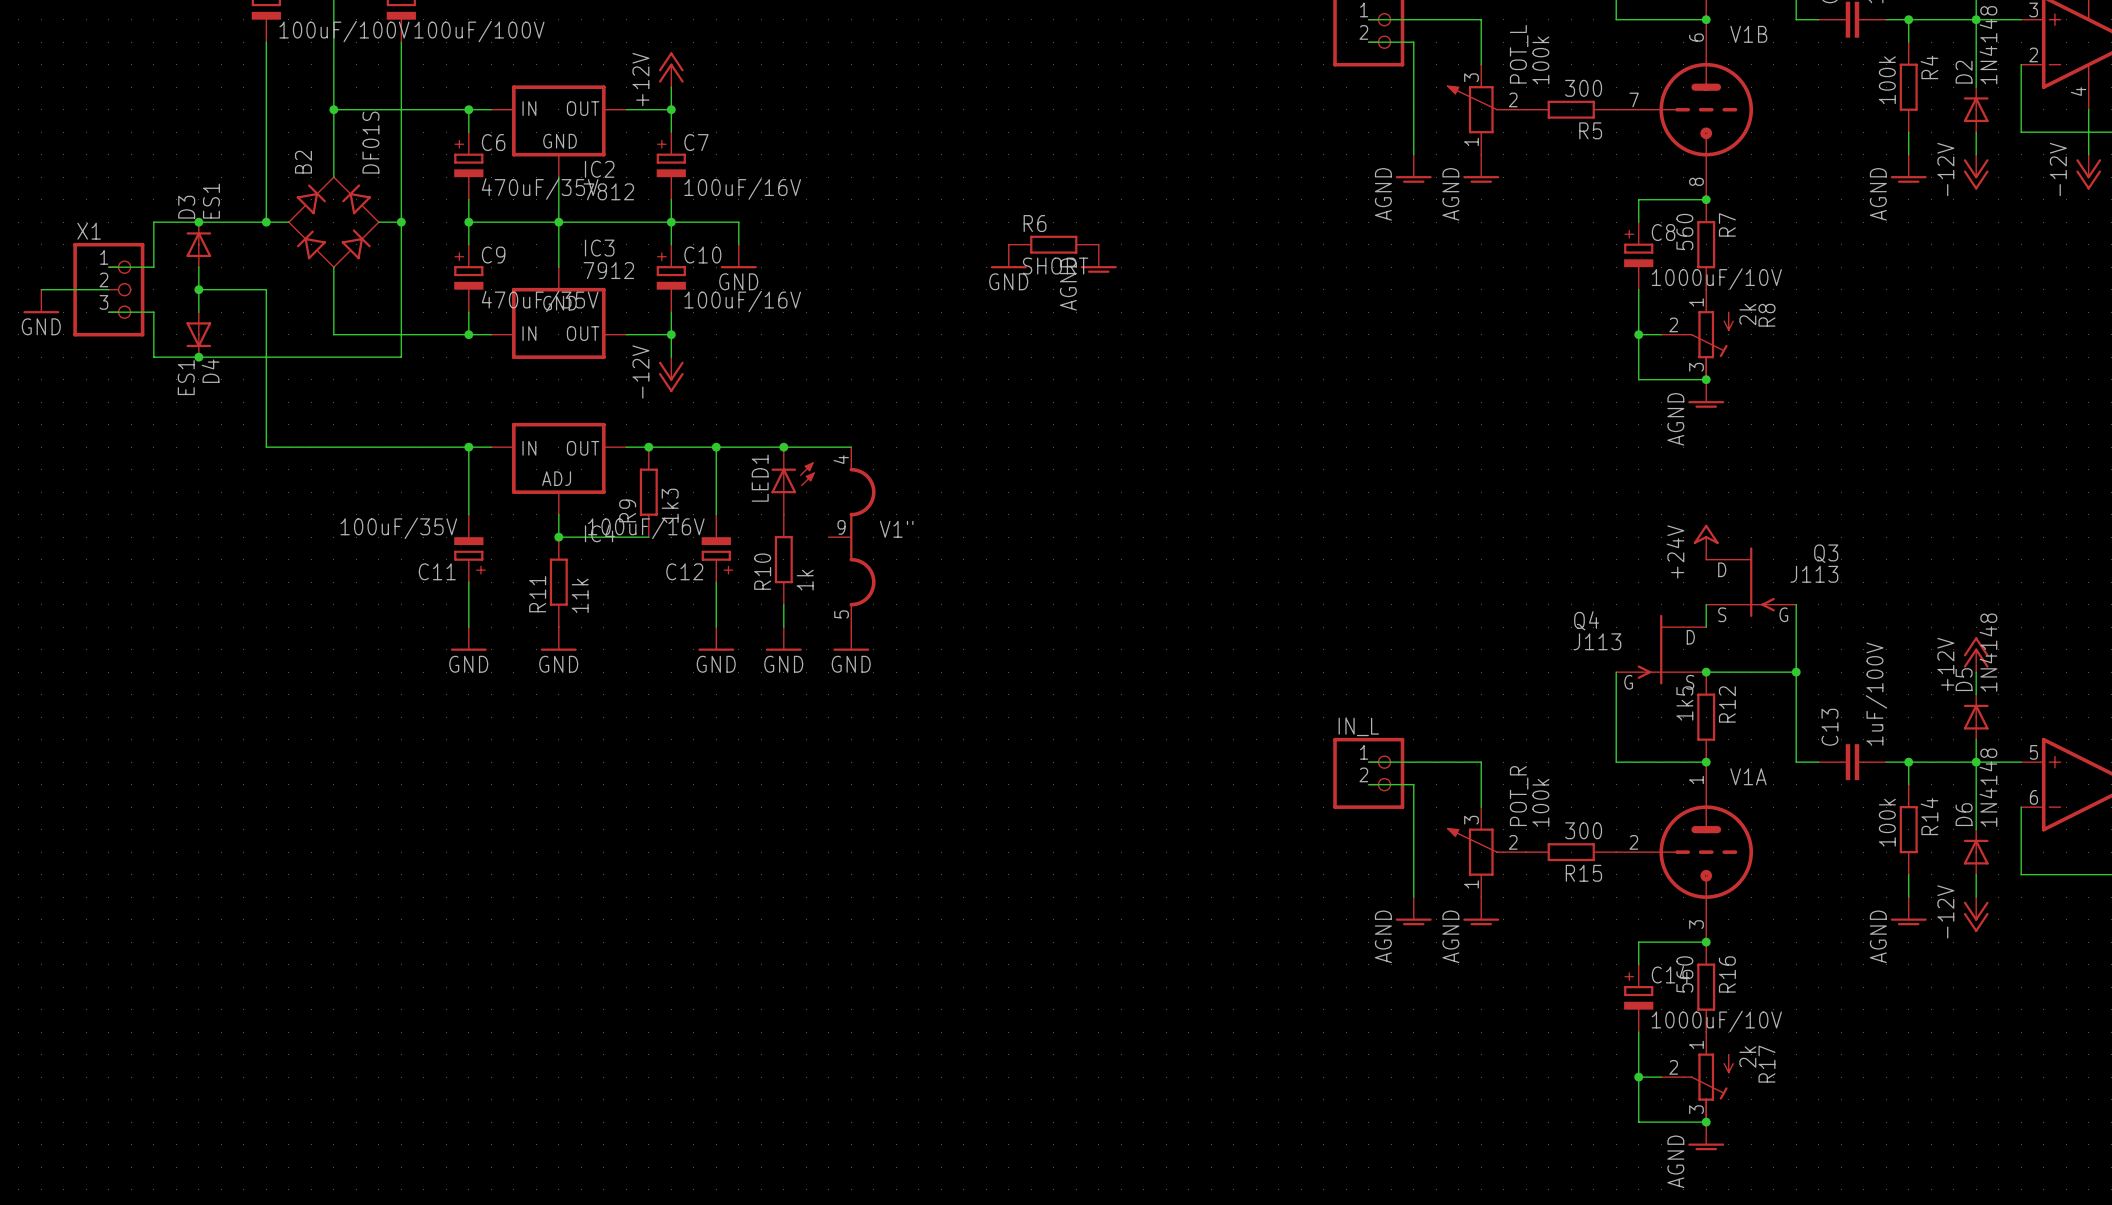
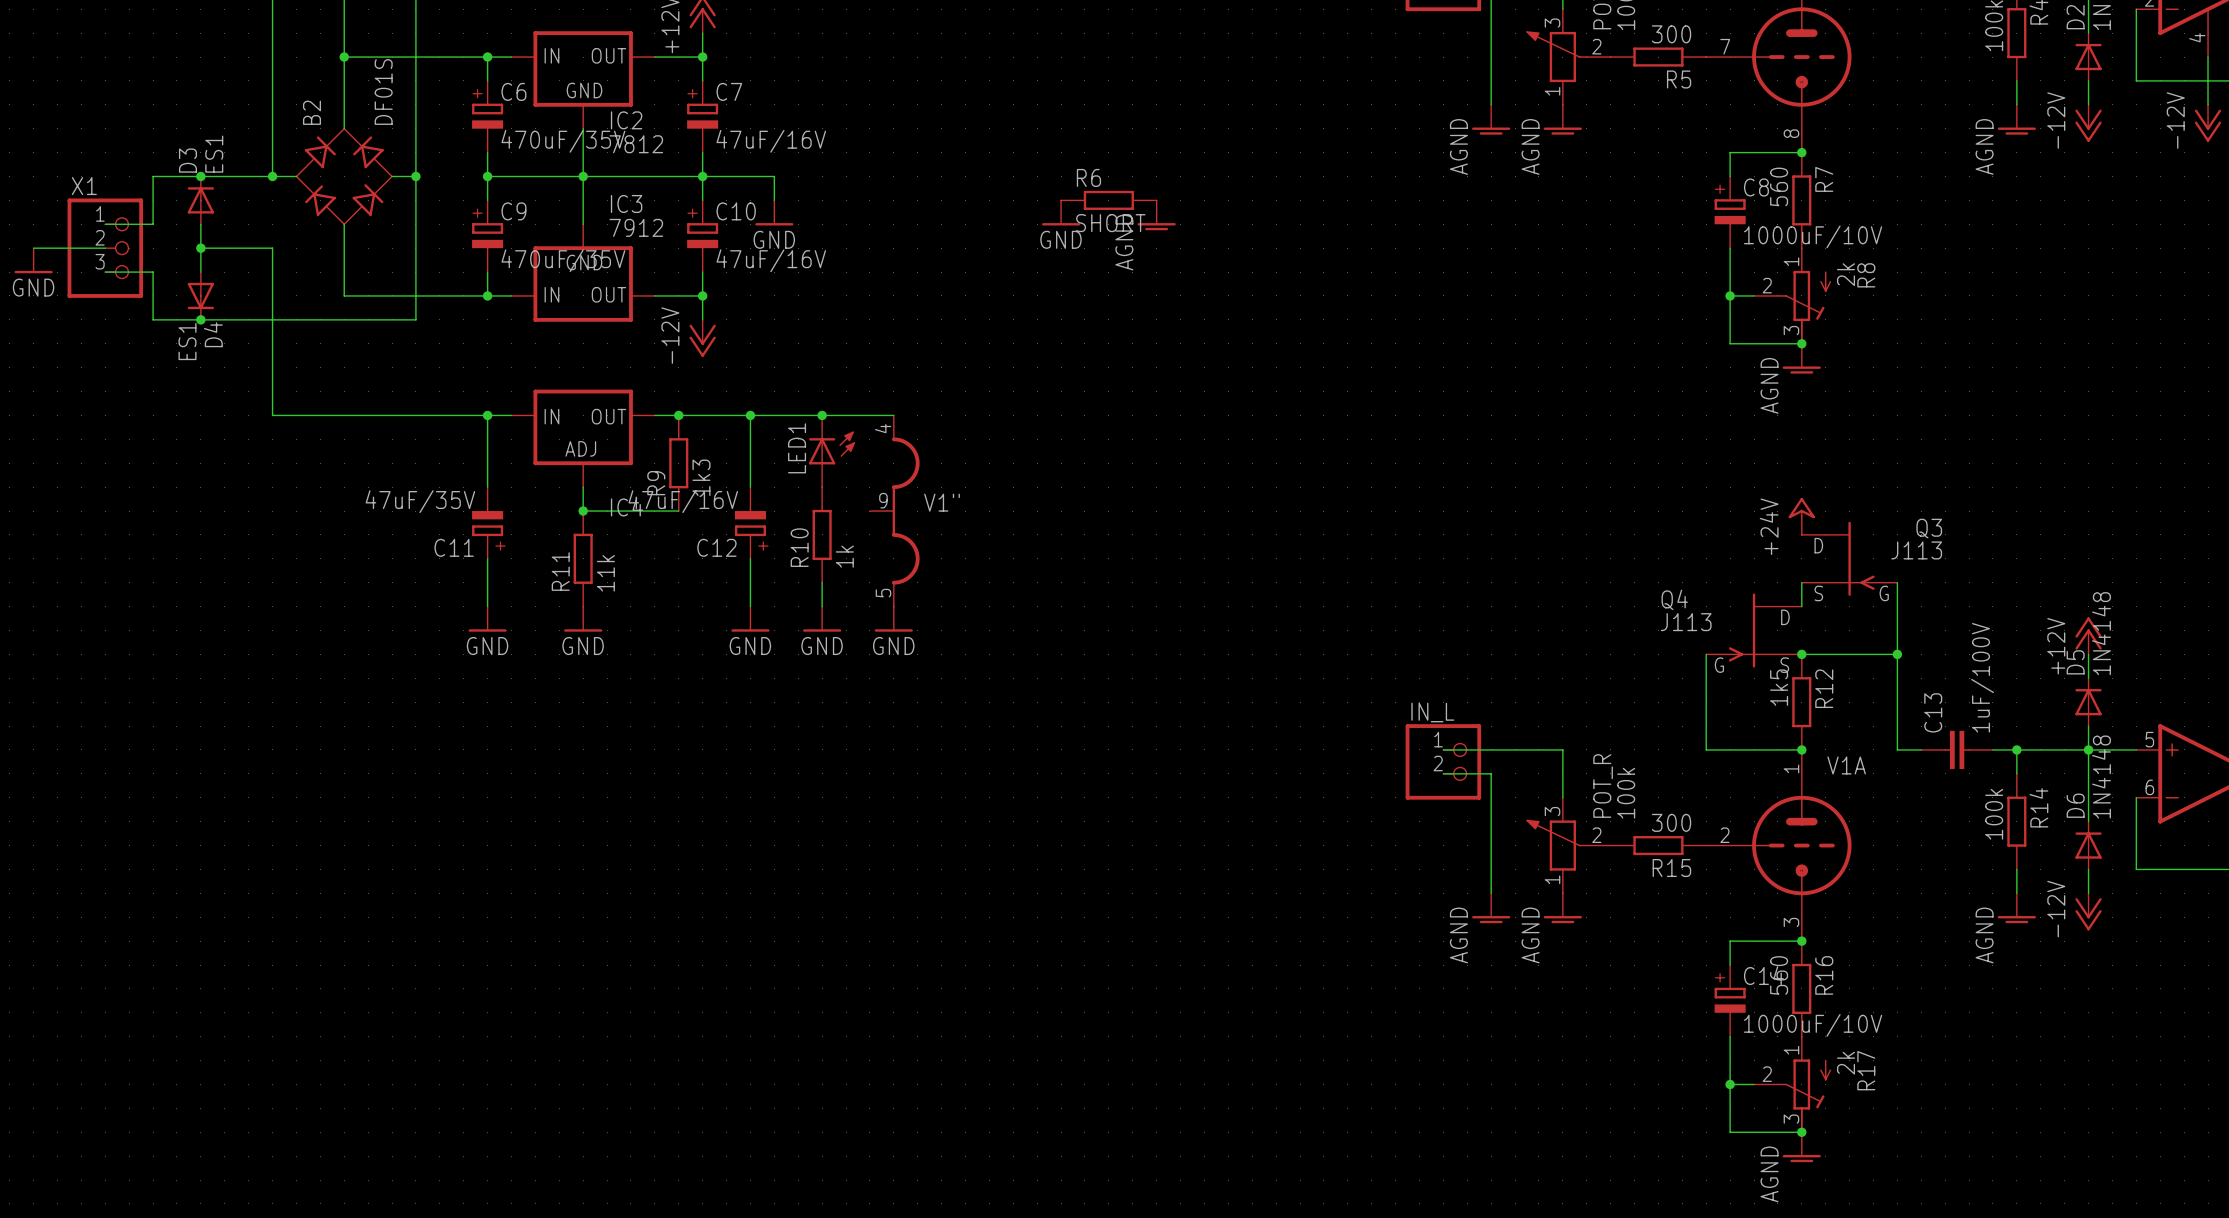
C7 value: 100uF/16V (742, 189) -> 47uF/16V (771, 141)
C10 value: 100uF/16V (742, 301) -> 47uF/16V (771, 260)
C11 value: 100uF/35V (398, 528) -> 47uF/35V (420, 501)
C12 value: 100uF/16V (646, 528) -> 47uF/16V (683, 501)

